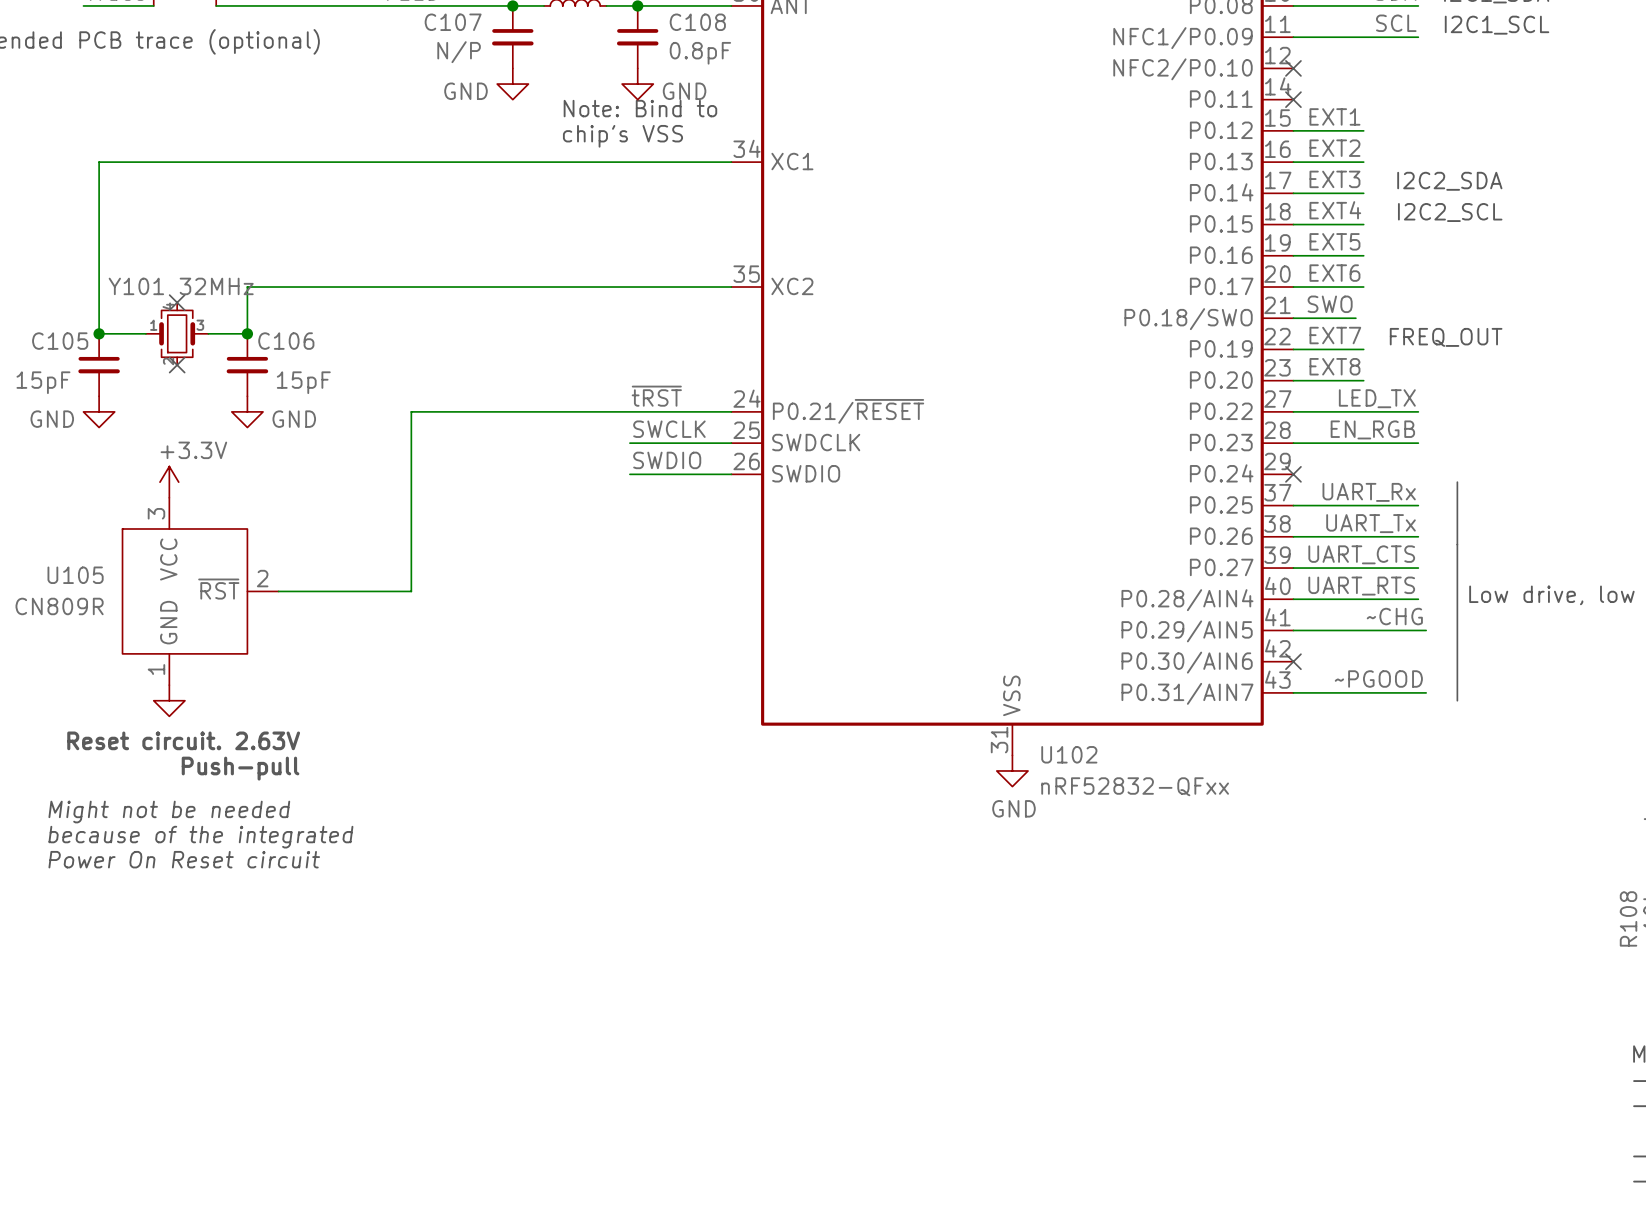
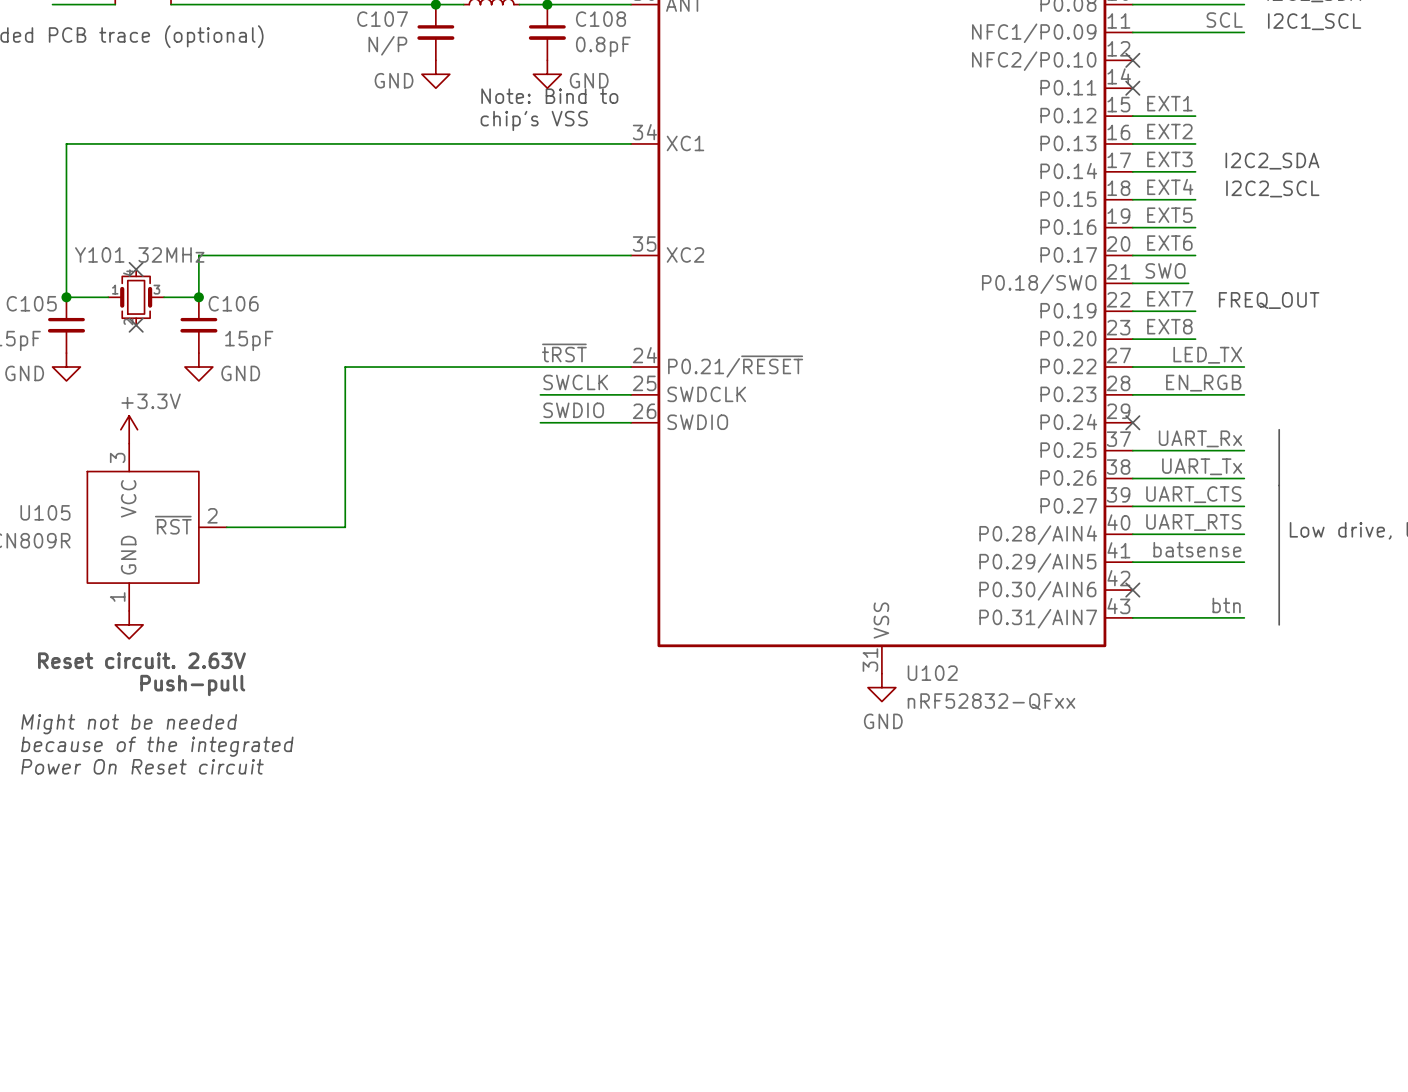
label: ~CHG (1394, 616) -> batsense (1197, 549)
wire: (1418, 630) (1426, 630) -> none
label: ~PGOOD (1378, 678) -> btn (1226, 605)
wire: (1418, 692) (1426, 692) -> none

